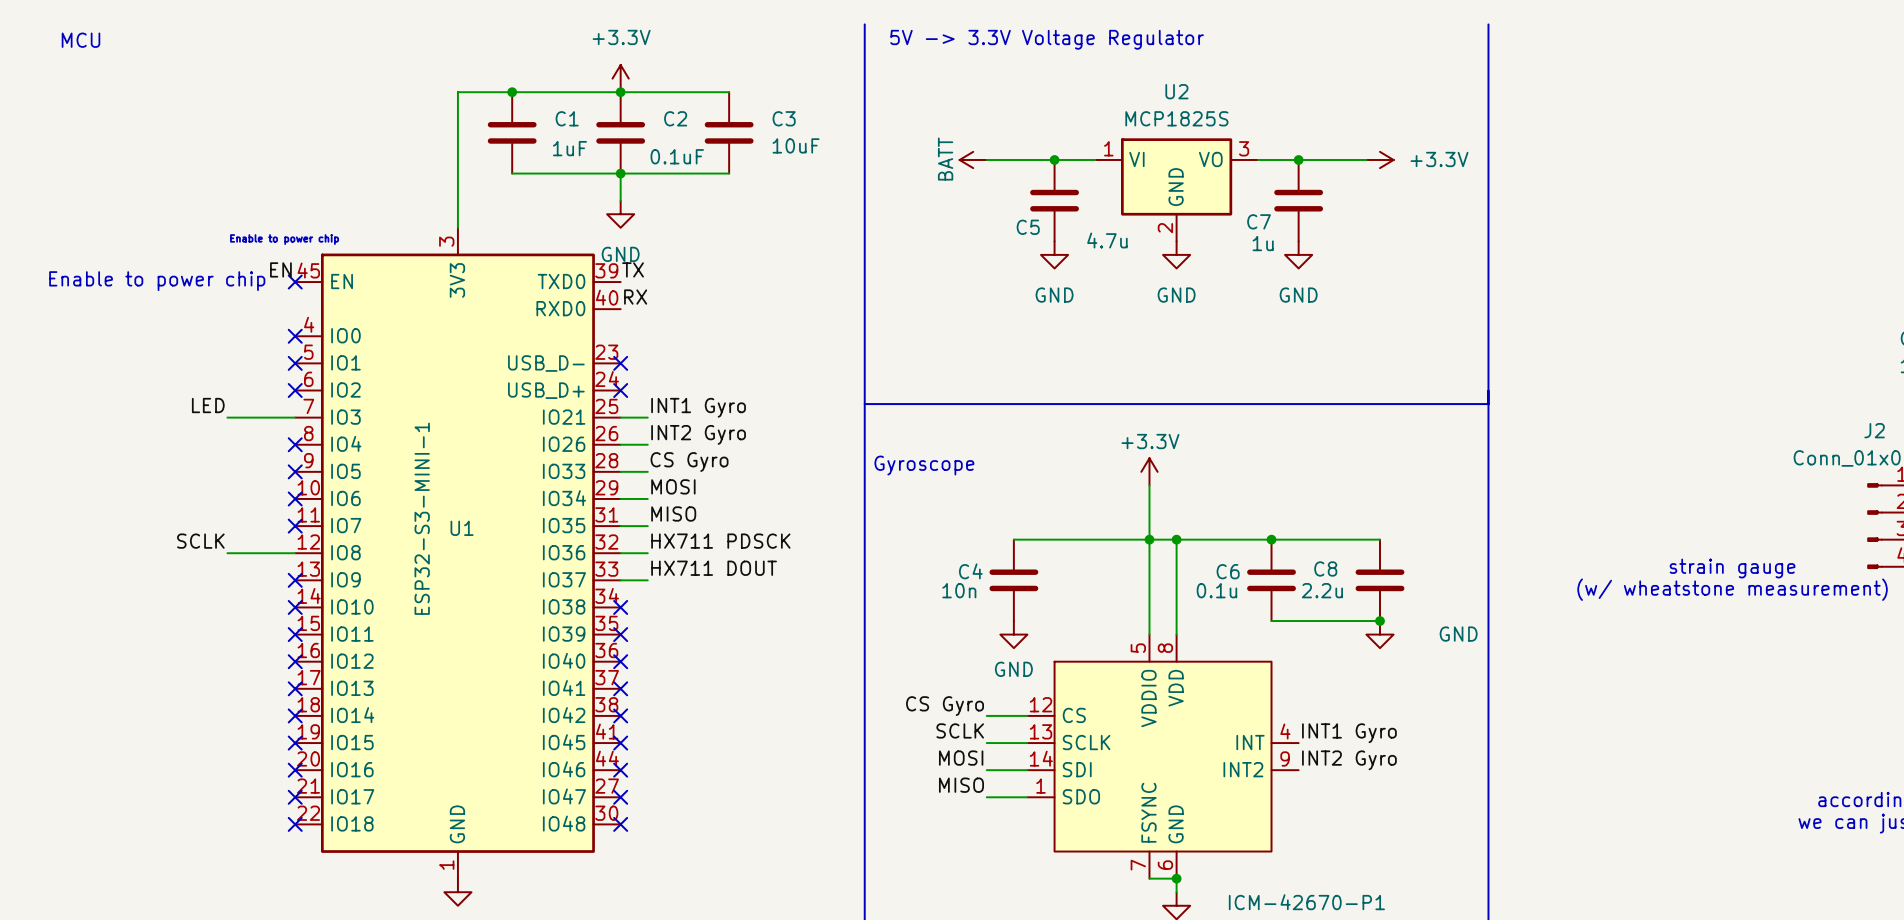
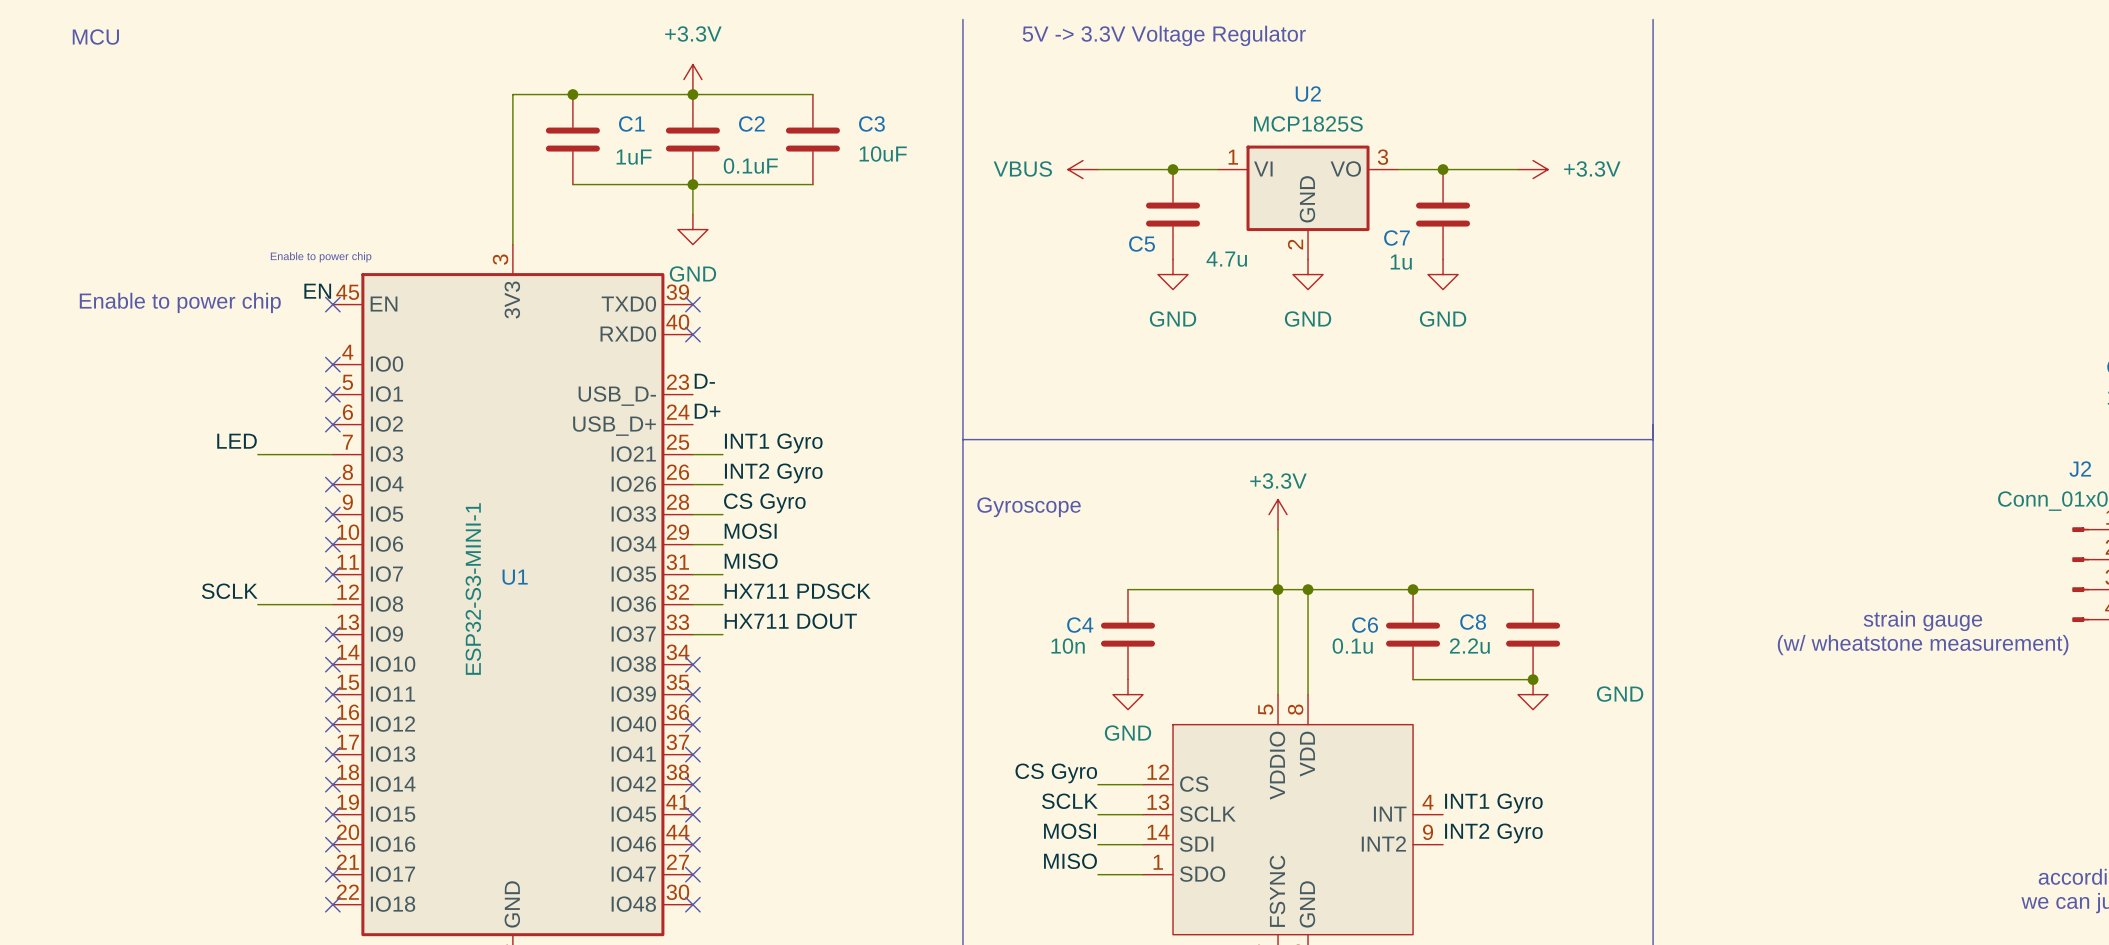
power symbol: BATT (973, 159) -> VBUS (1082, 169)
label: TX (633, 269) -> none
no-connect mark: none -> (692, 304)
label: RX (635, 297) -> none
no-connect mark: none -> (692, 334)
label: none -> D- (704, 381)
no-connect mark: (620, 363) -> none
label: none -> D+ (707, 411)
no-connect mark: (620, 390) -> none

